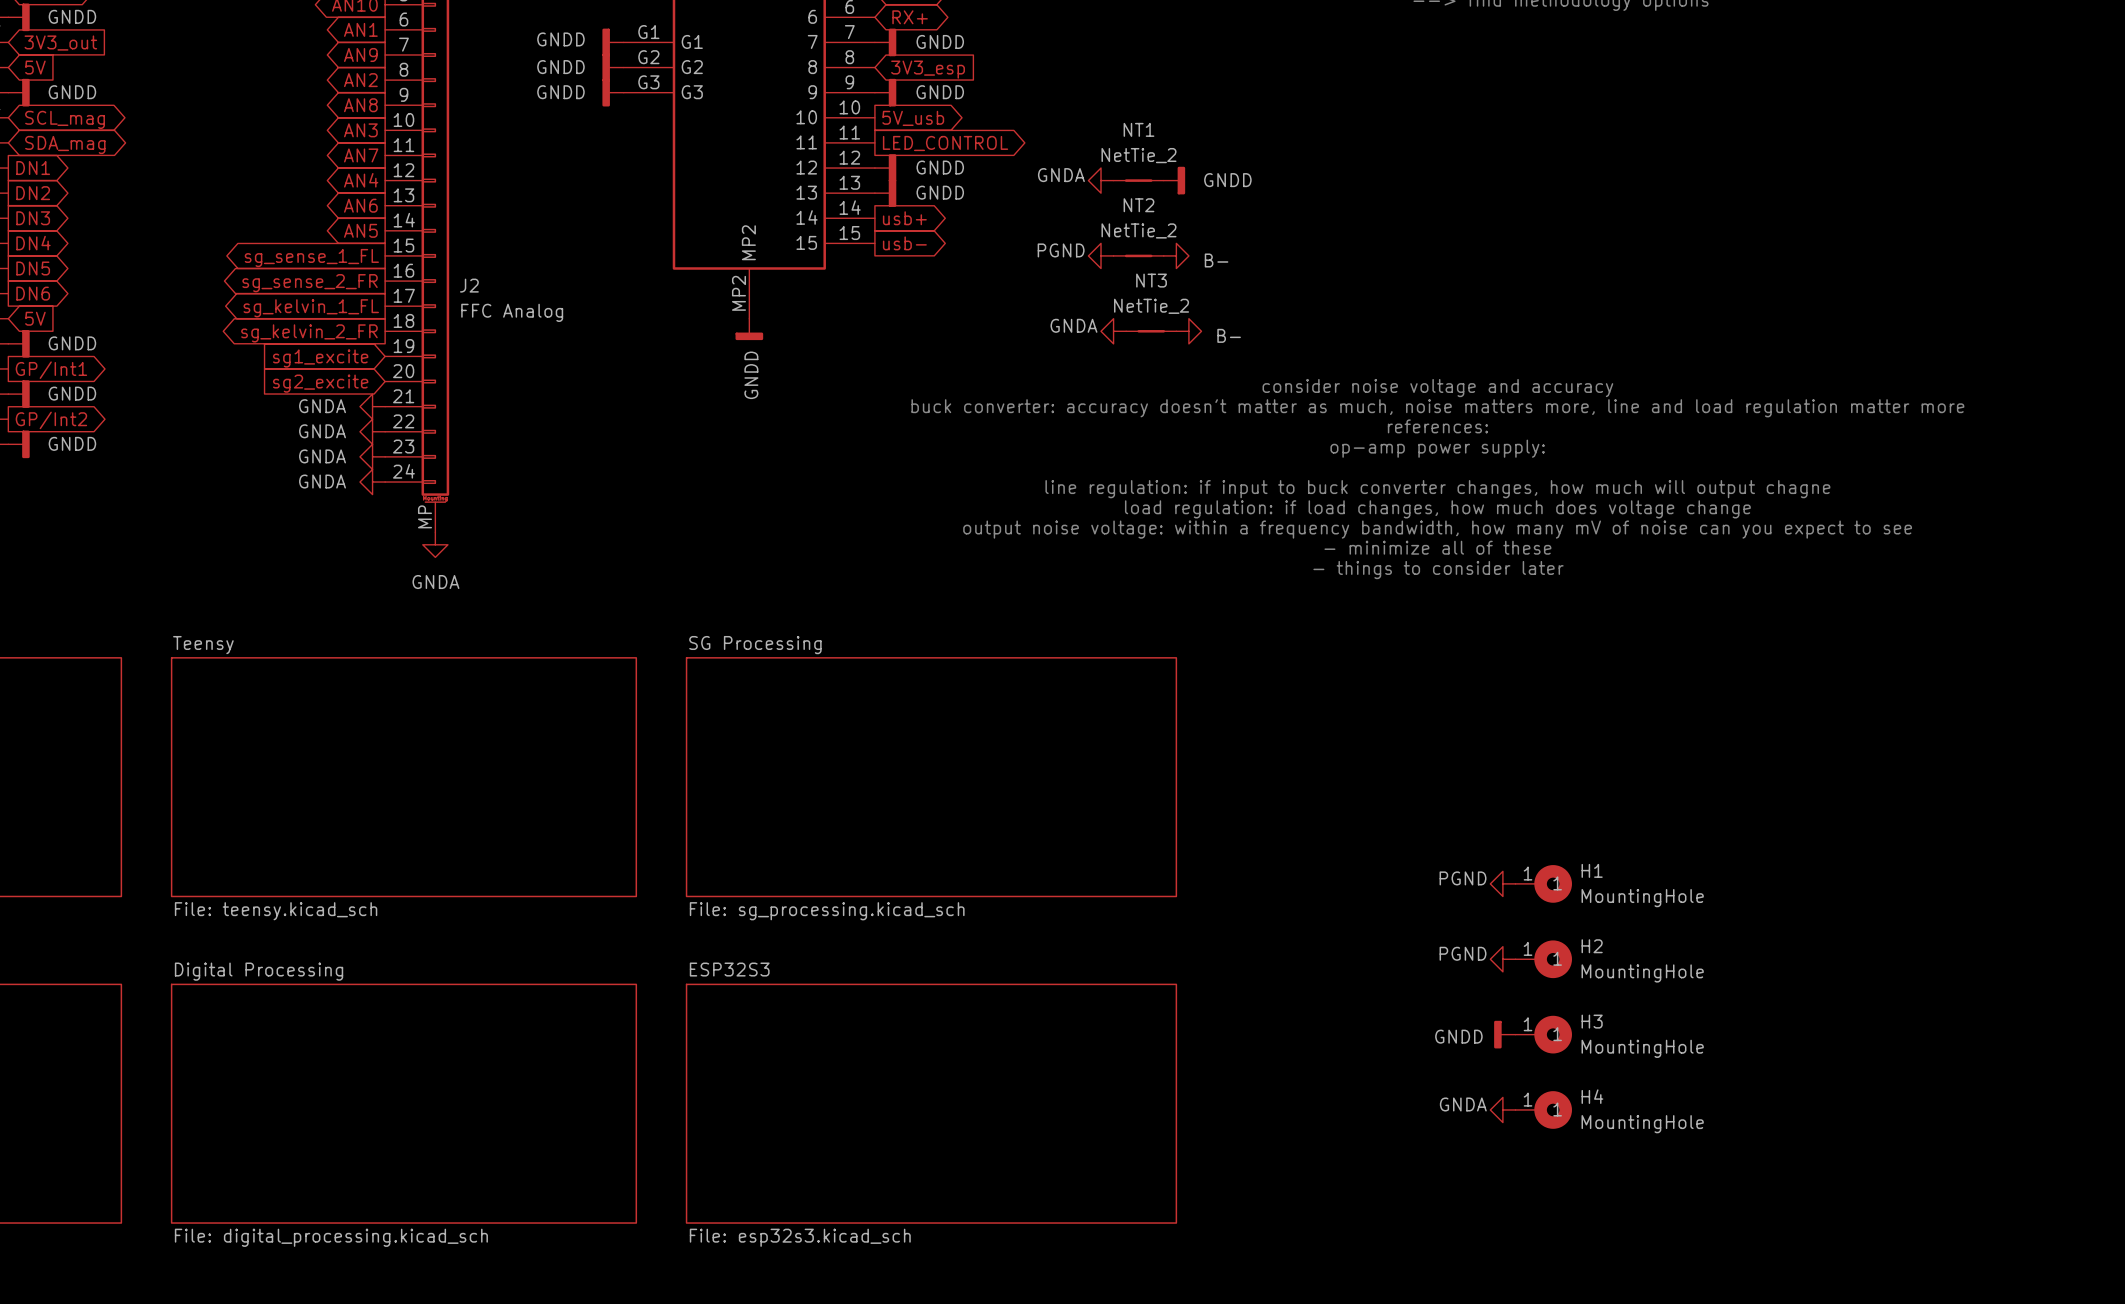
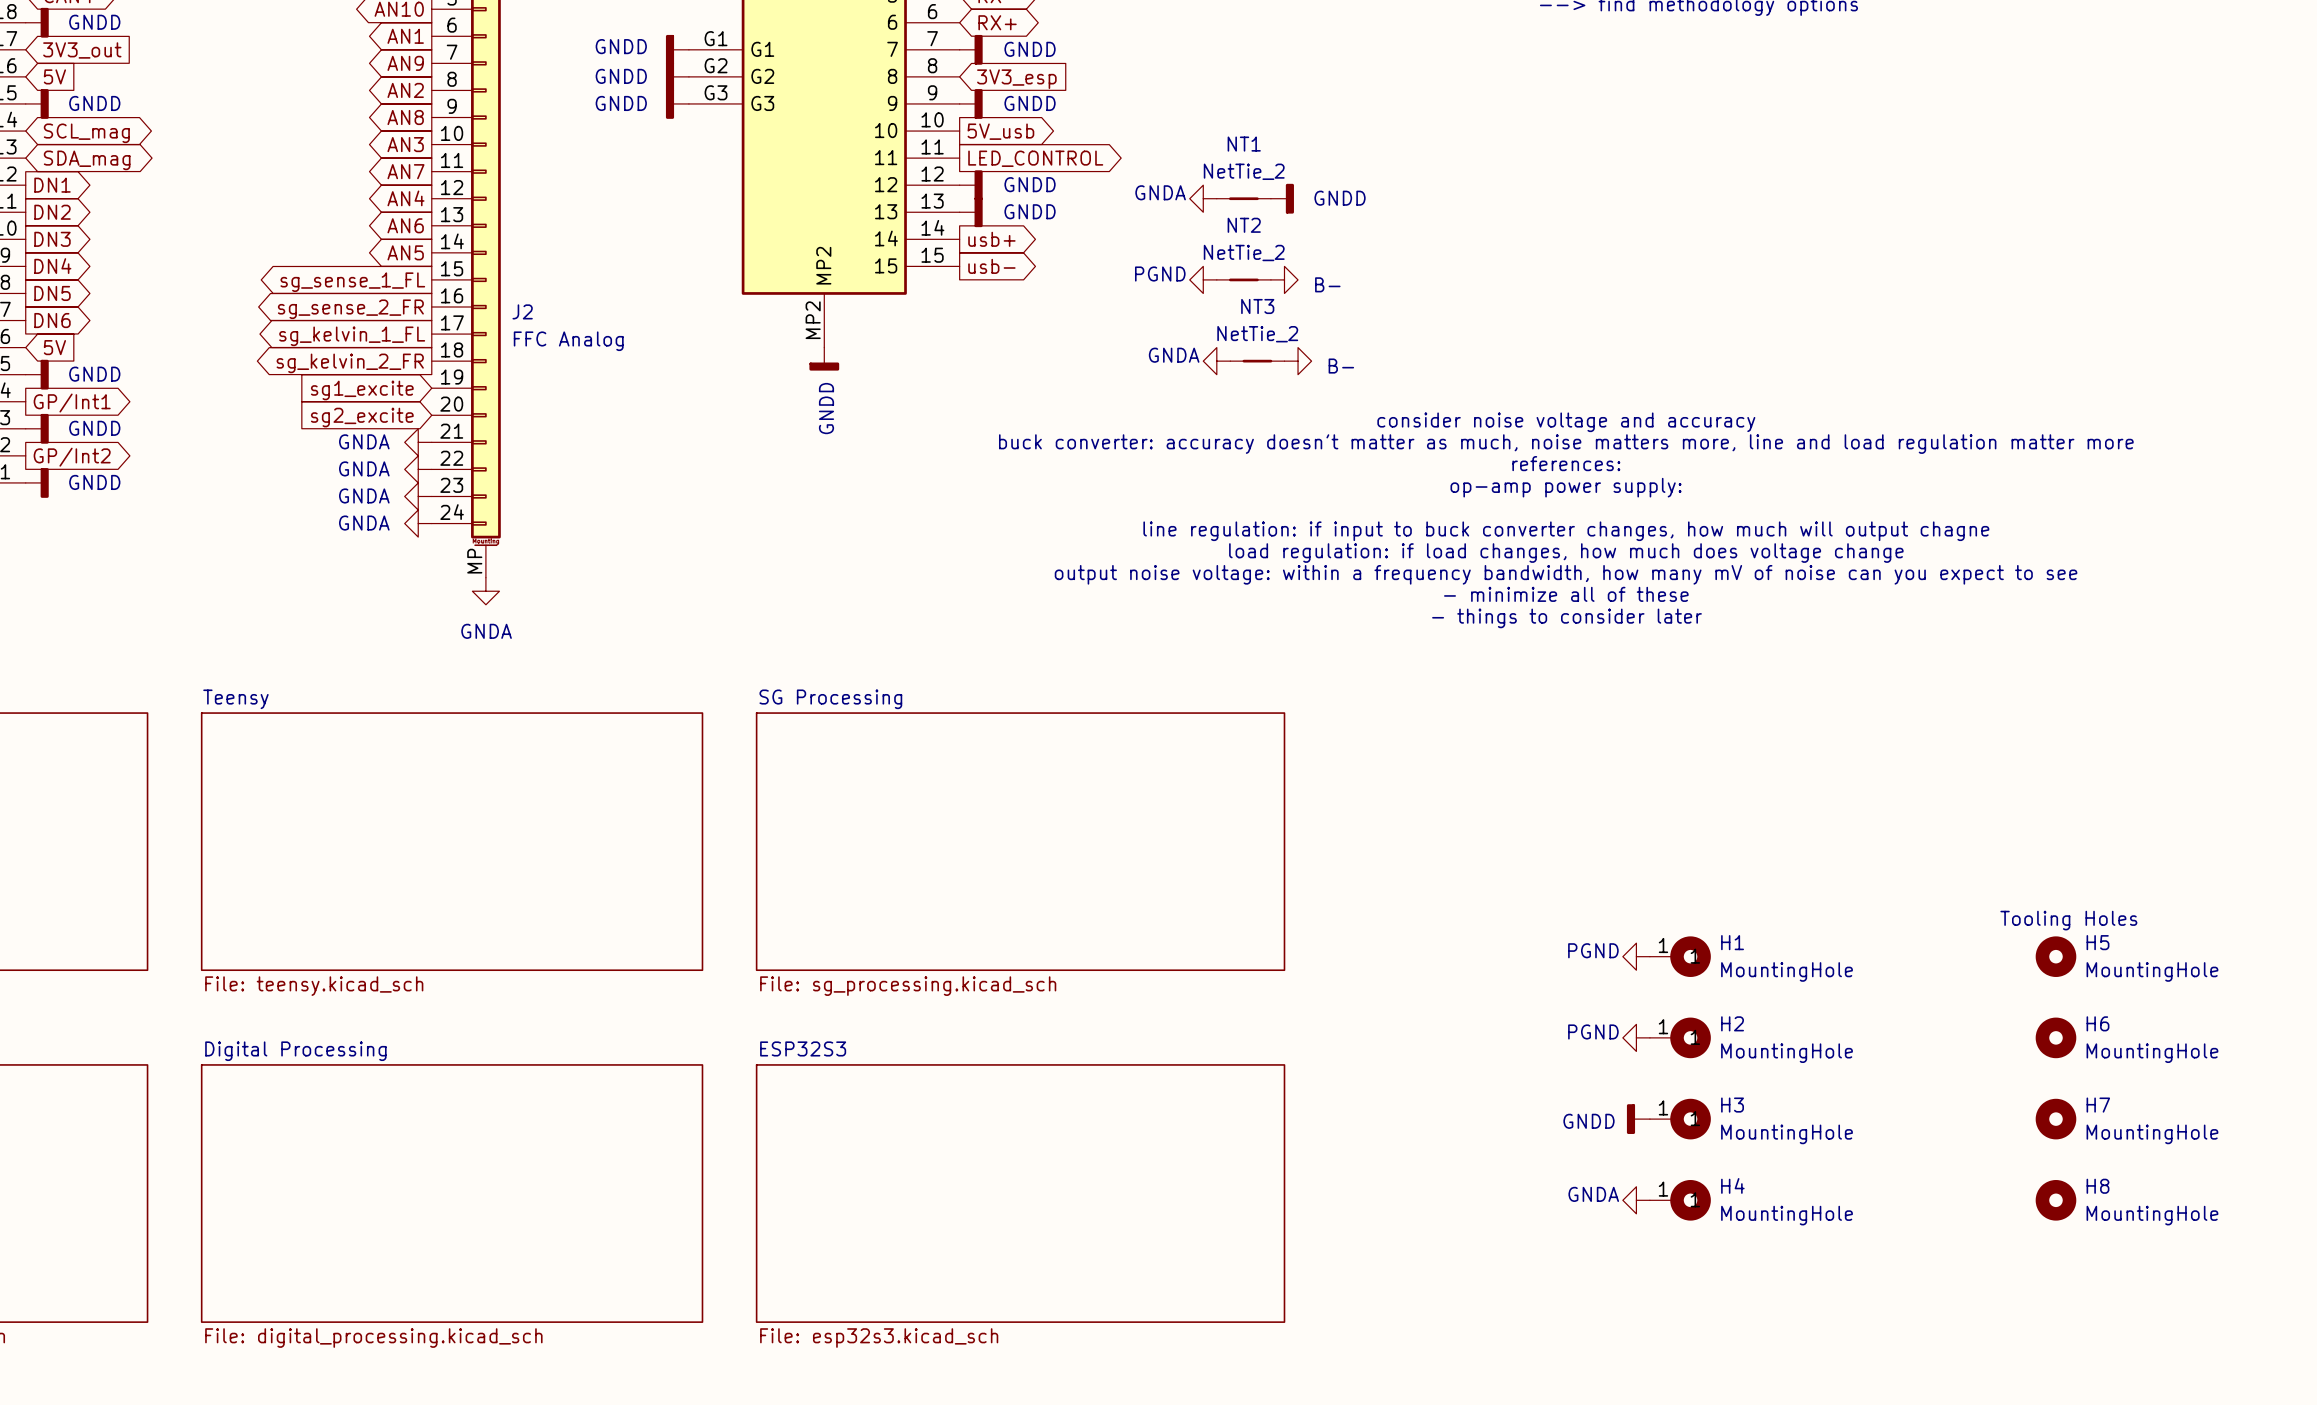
text: none -> Tooling Holes (2068, 920)
H5: none -> MountingHole (2055, 956)
H6: none -> MountingHole (2055, 1037)
H7: none -> MountingHole (2055, 1119)
H8: none -> MountingHole (2055, 1200)

